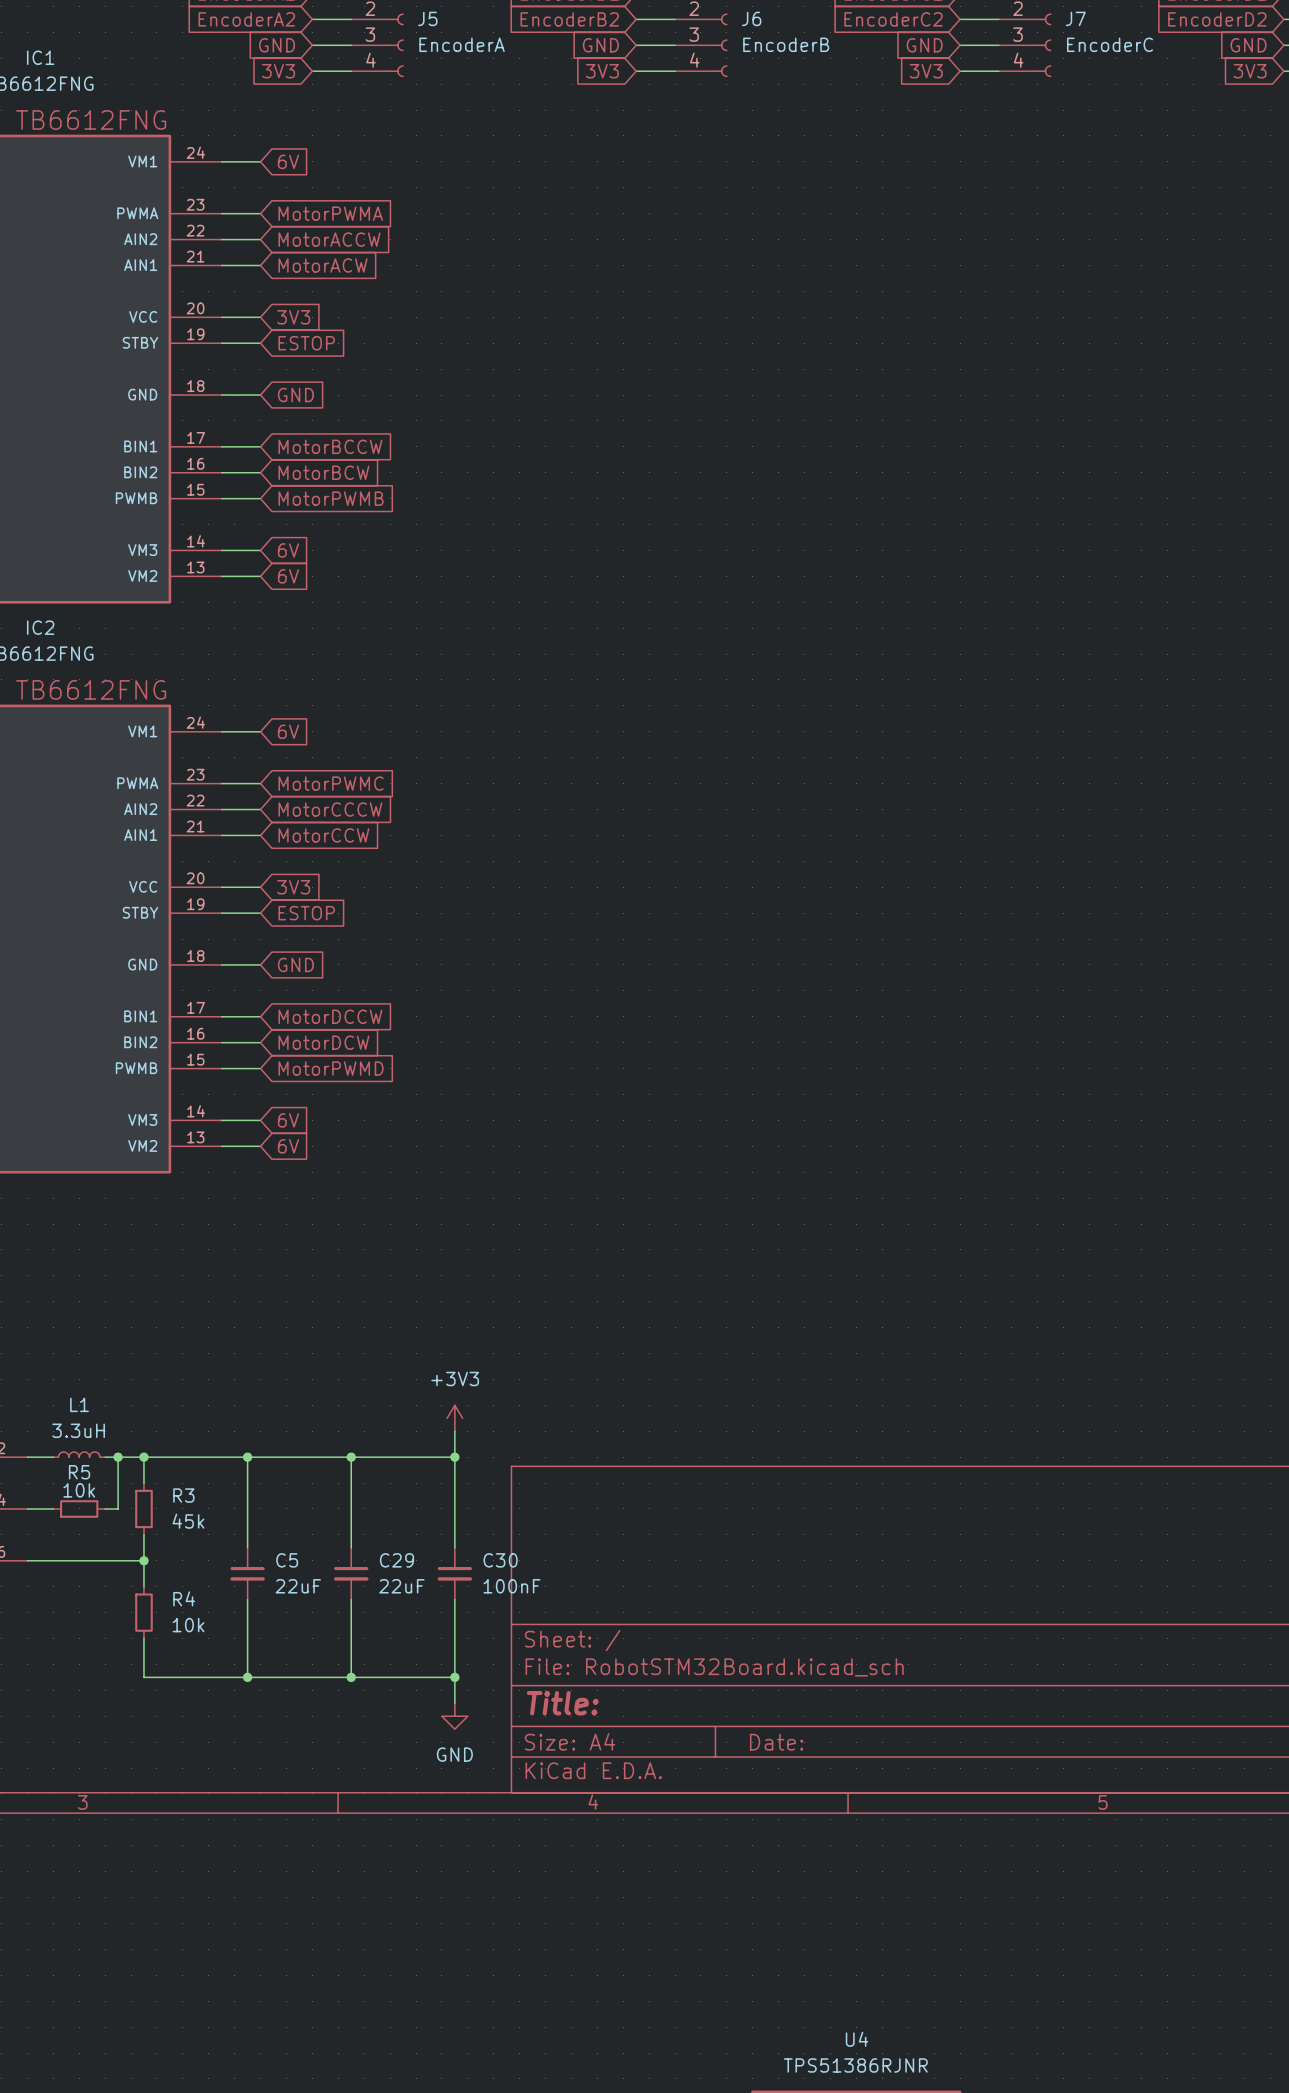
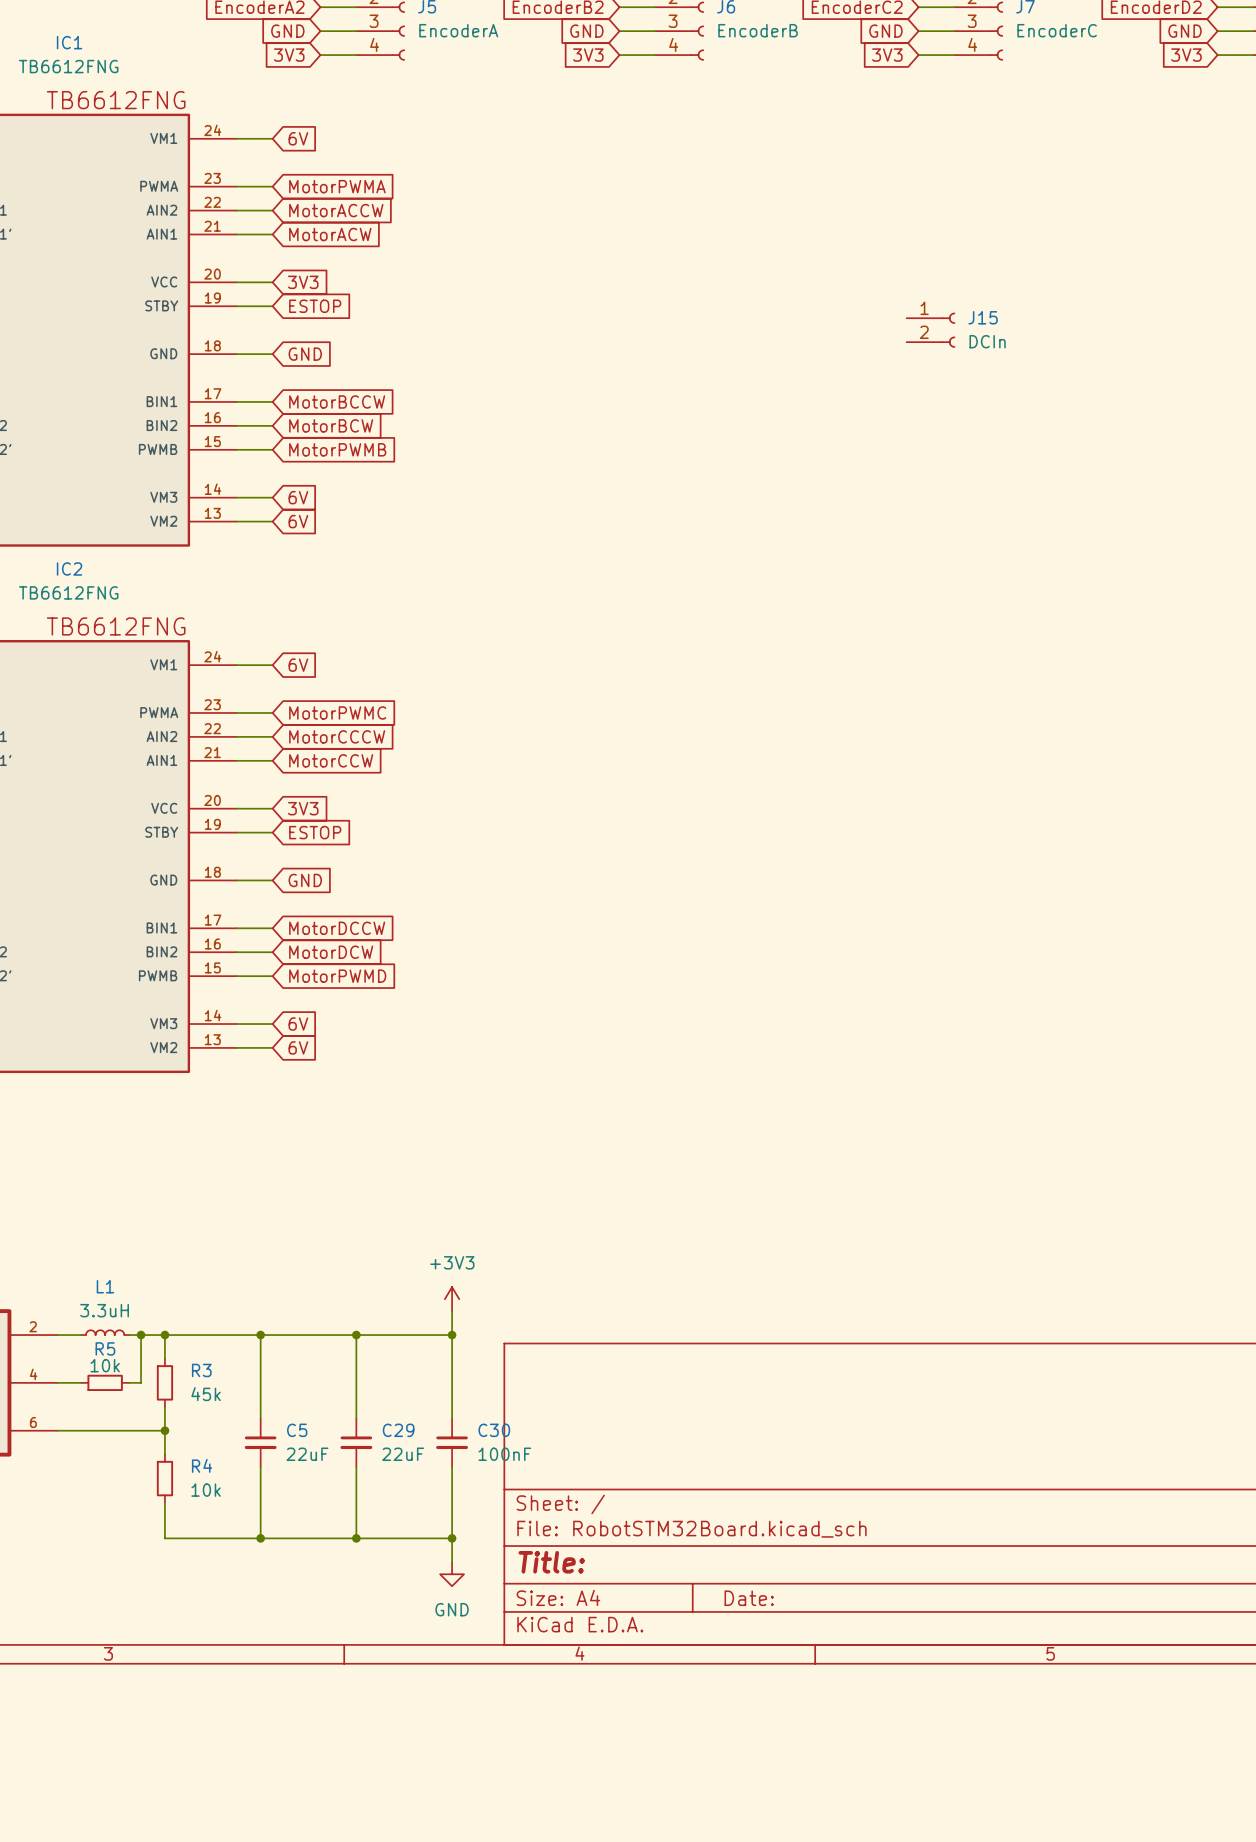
J15: none -> DCIn (930, 330)

